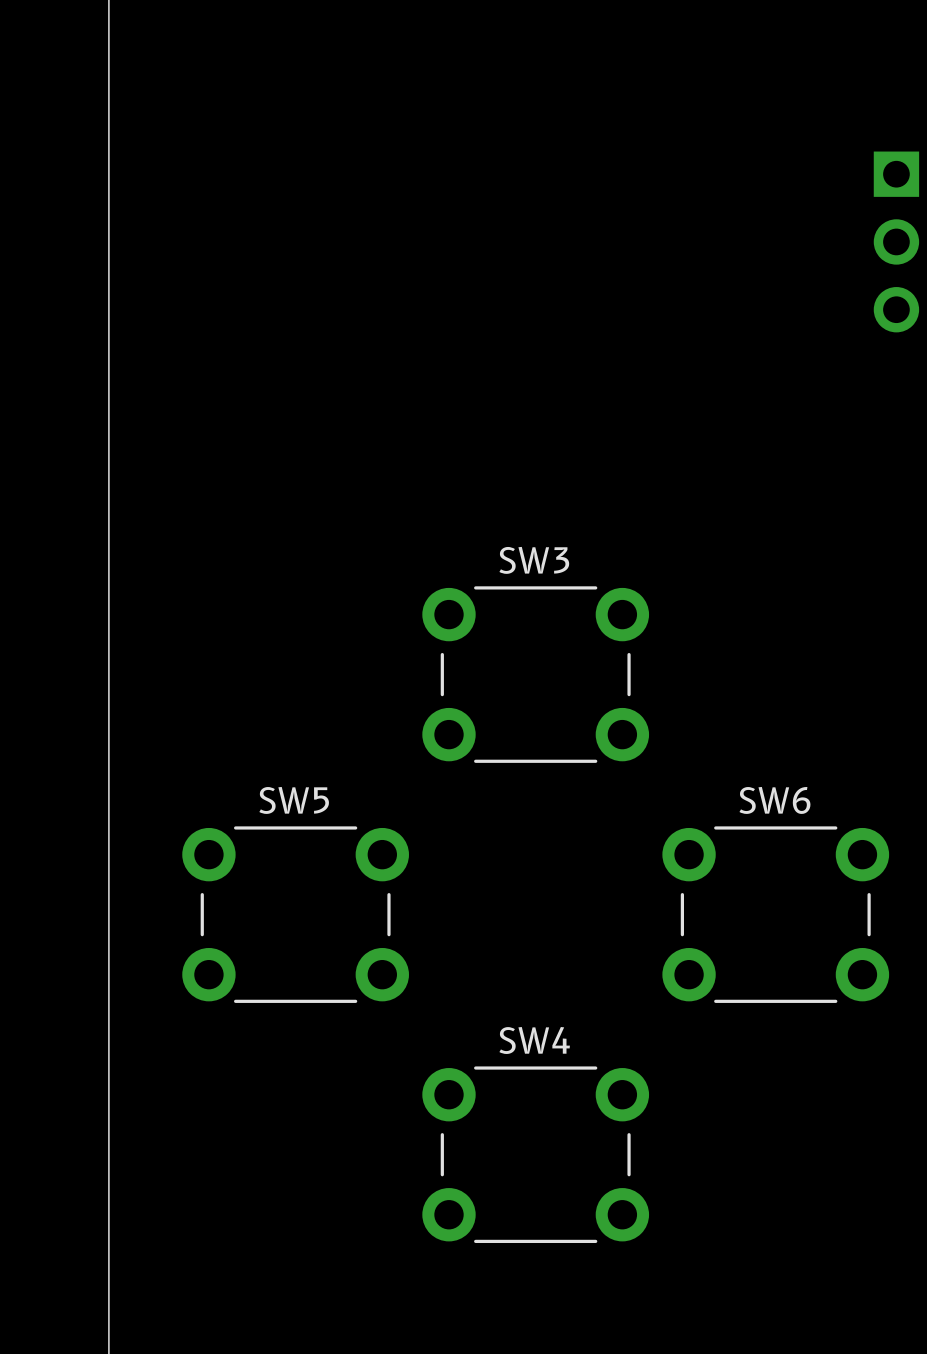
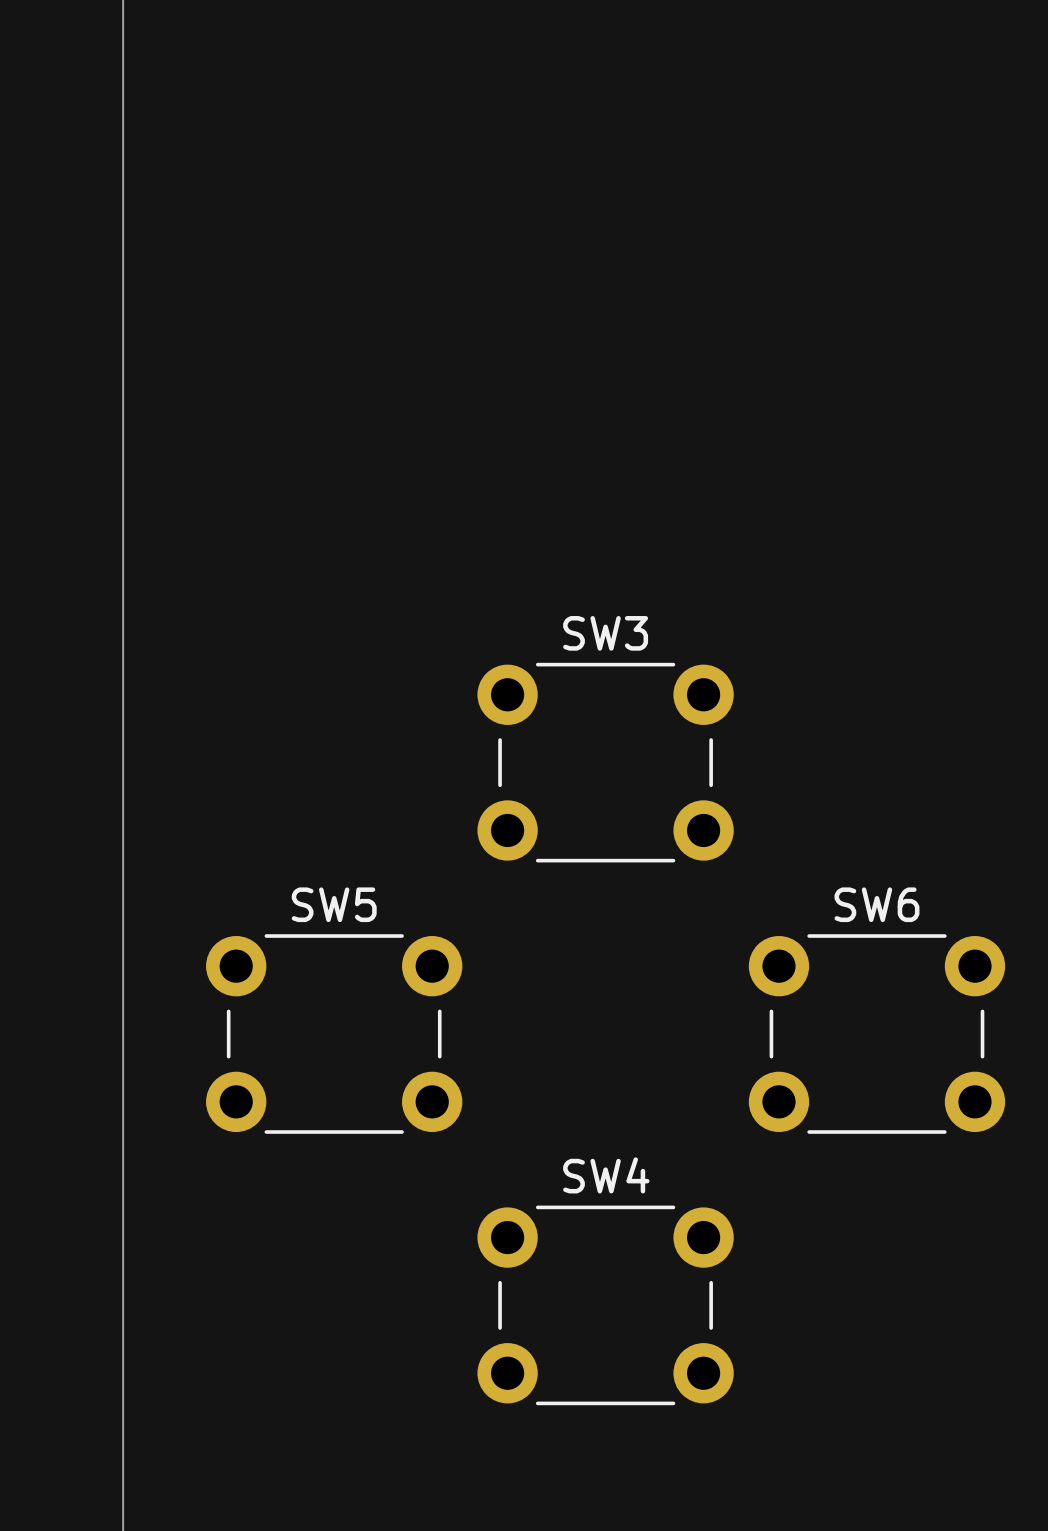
part: (896, 241) -> none

